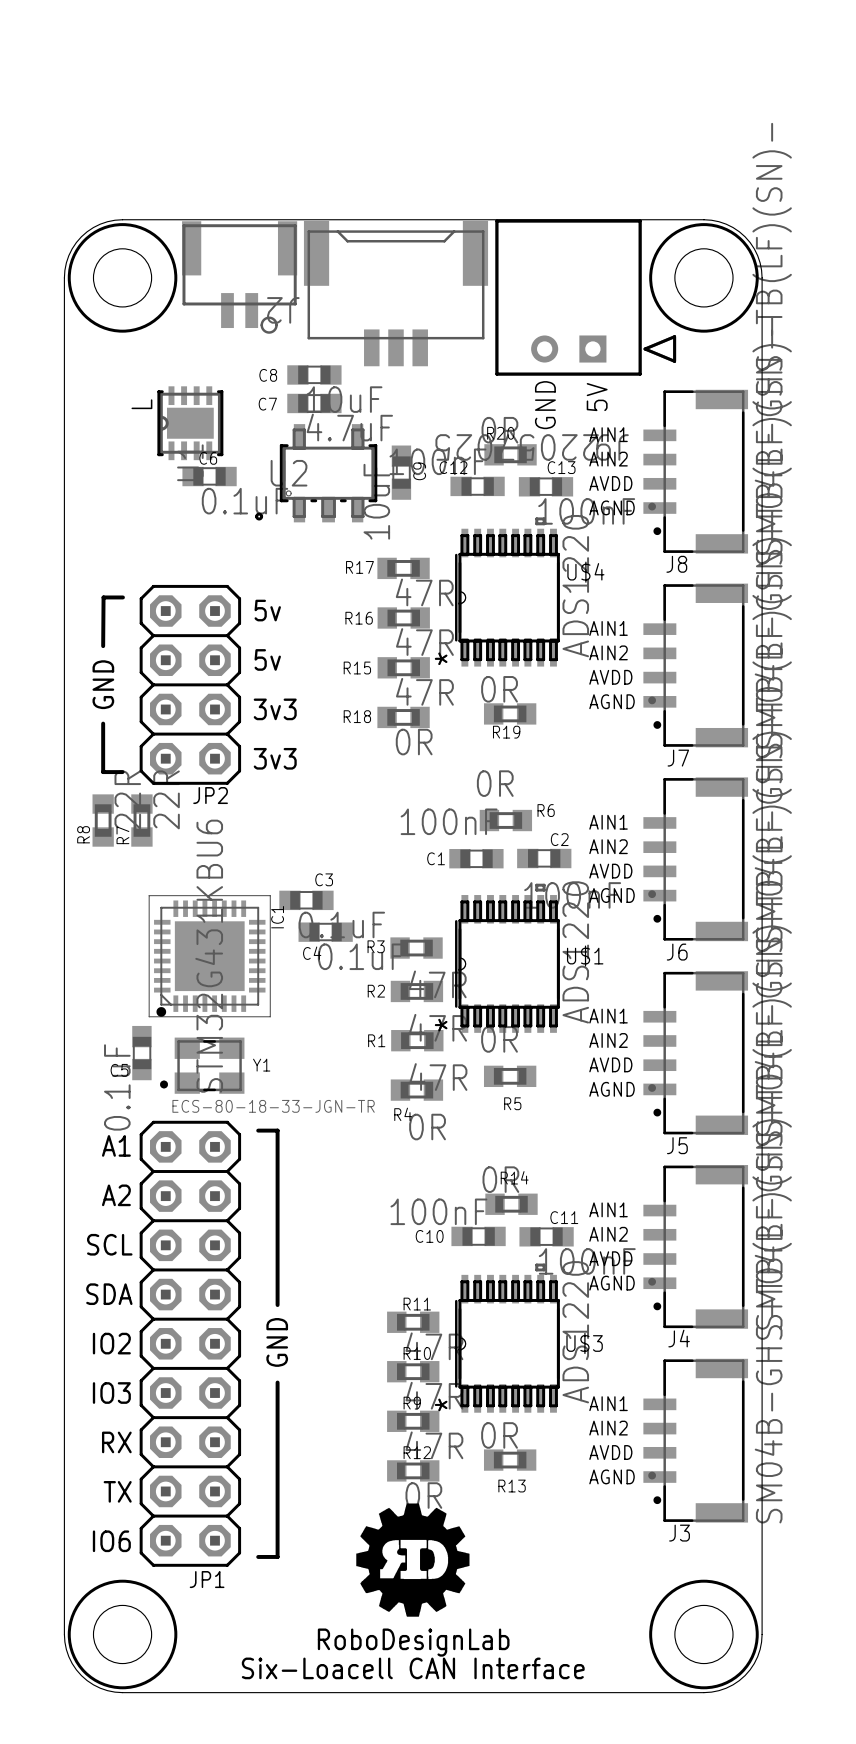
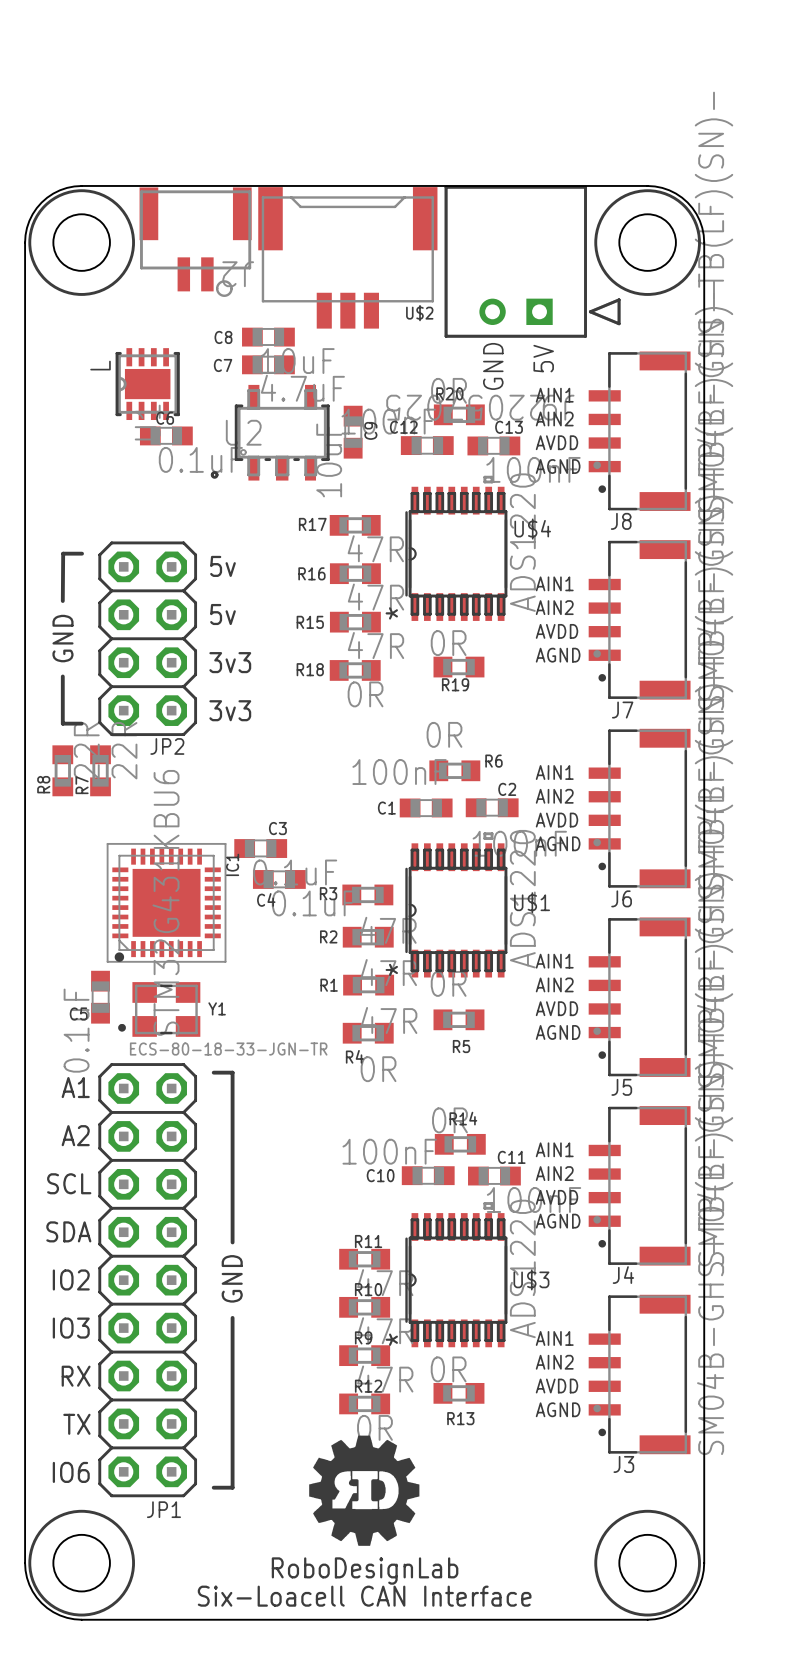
text: none -> U$2 (419, 313)

